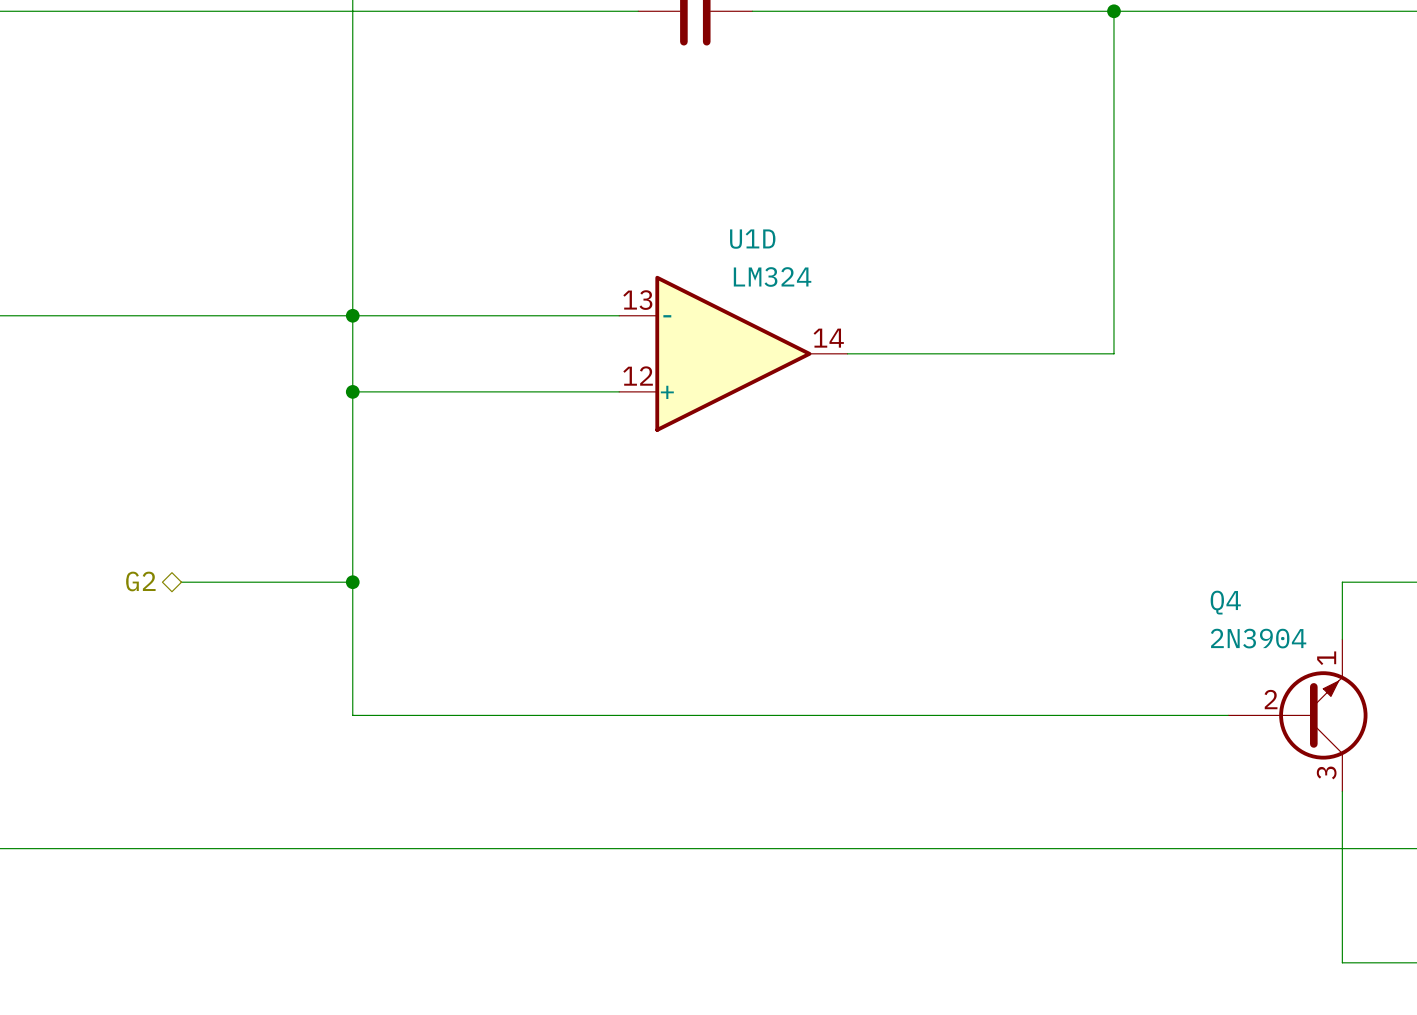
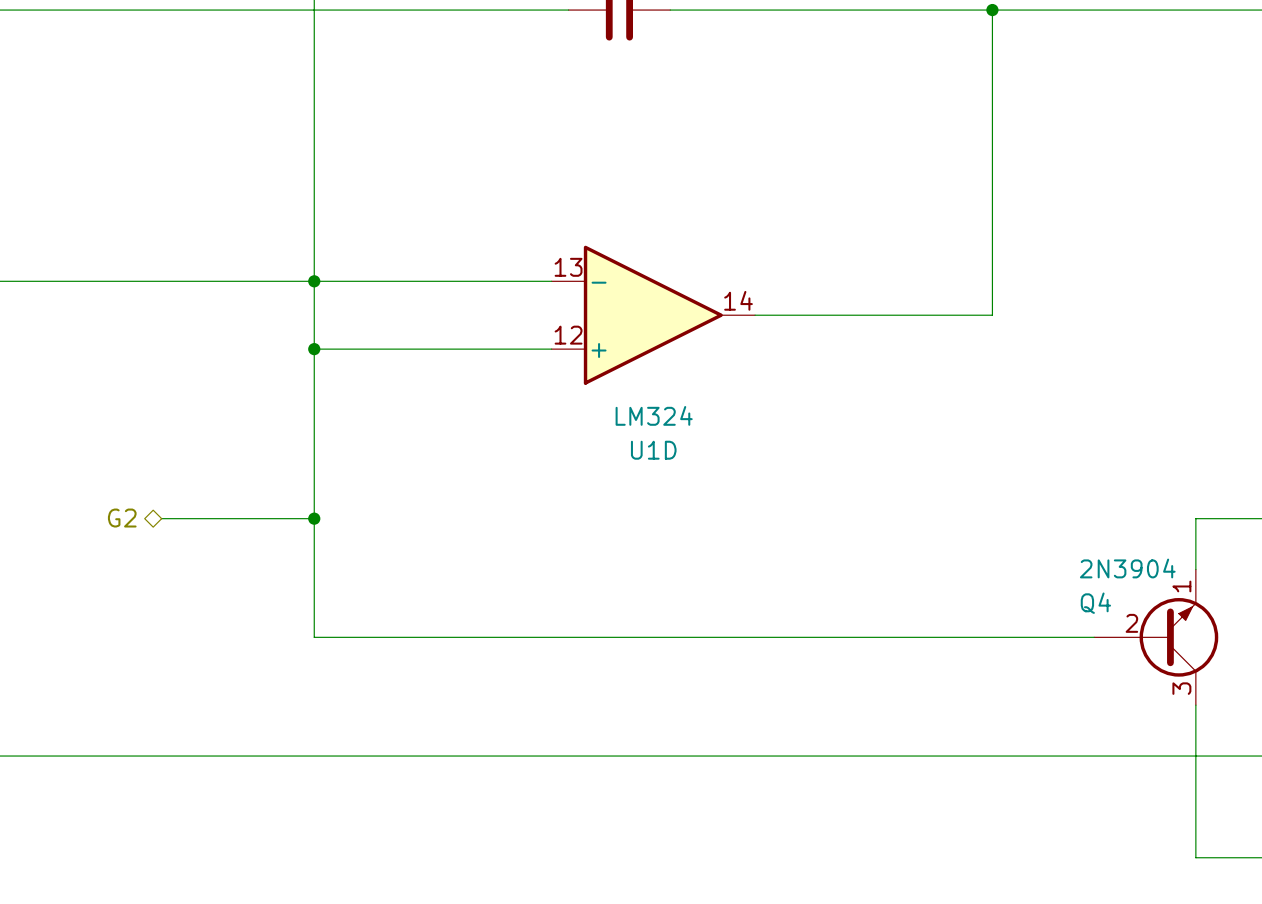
U1D name position: U1D (752, 239) -> U1D (653, 450)
U1D value position: LM324 (772, 276) -> LM324 (654, 415)
Q4 name position: Q4 (1225, 602) -> Q4 (1095, 603)

